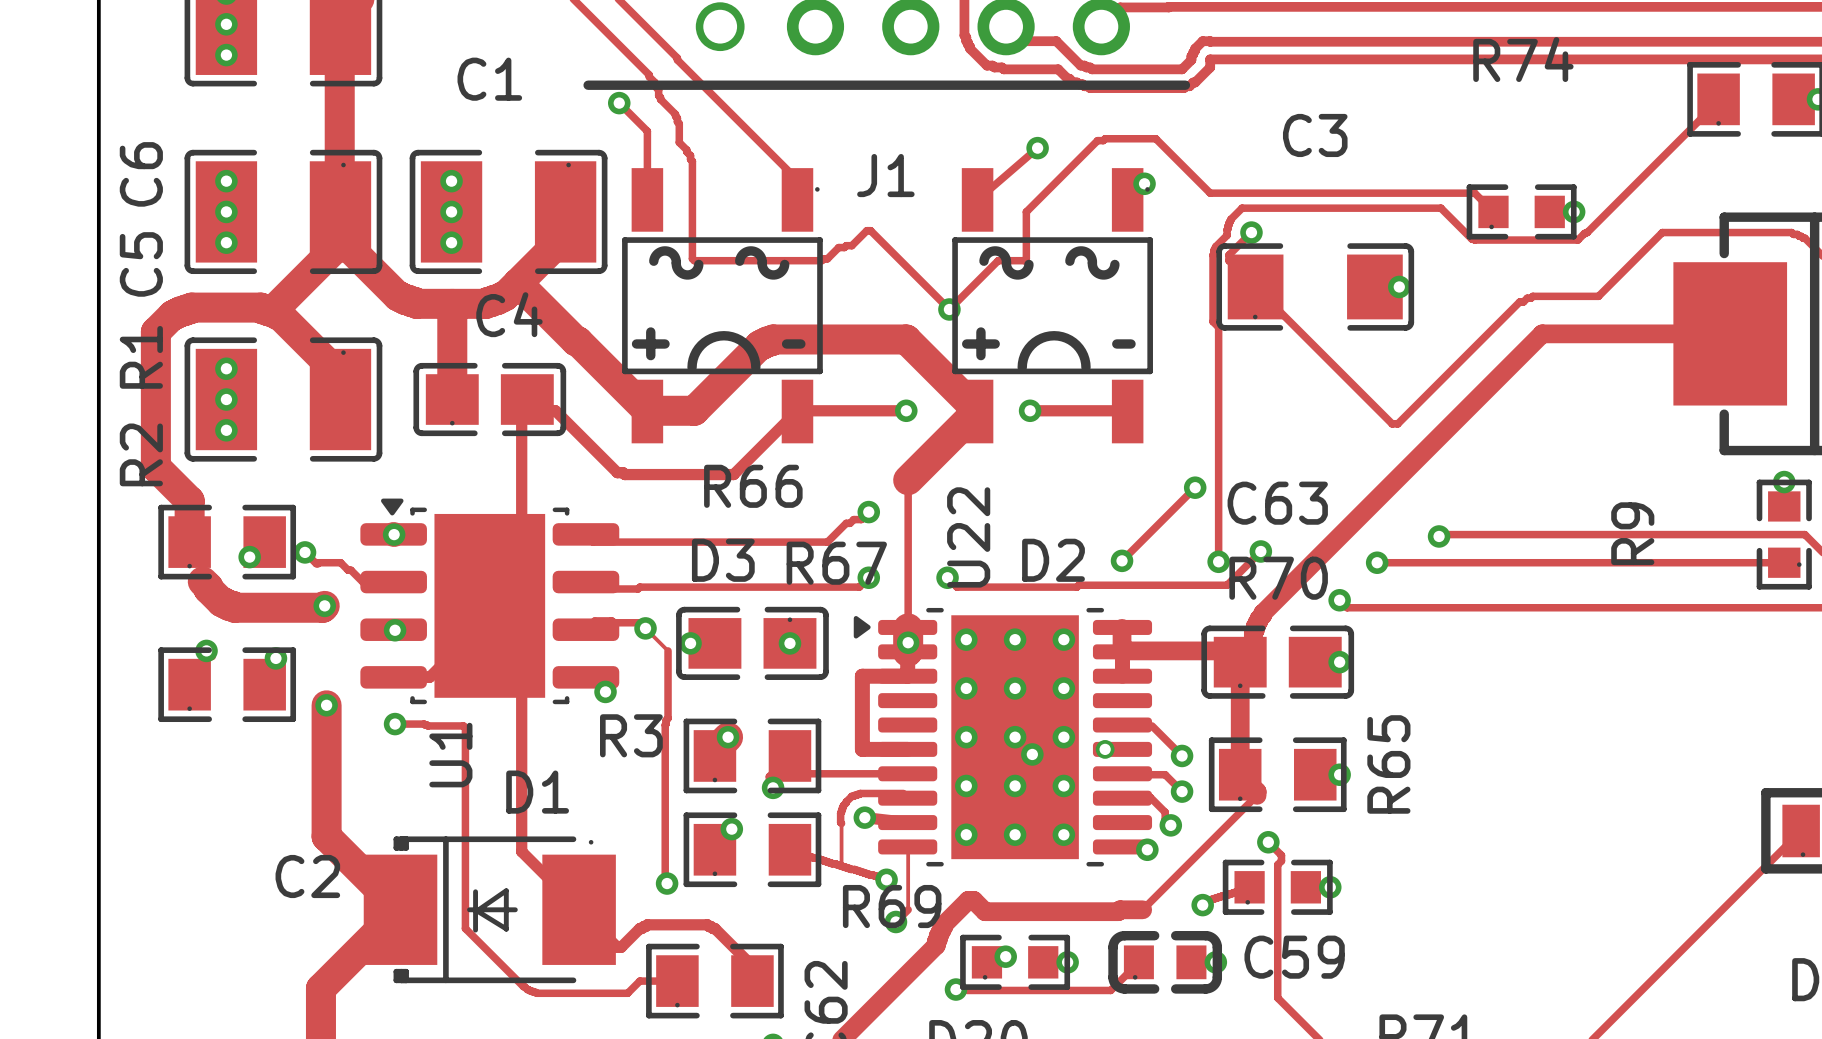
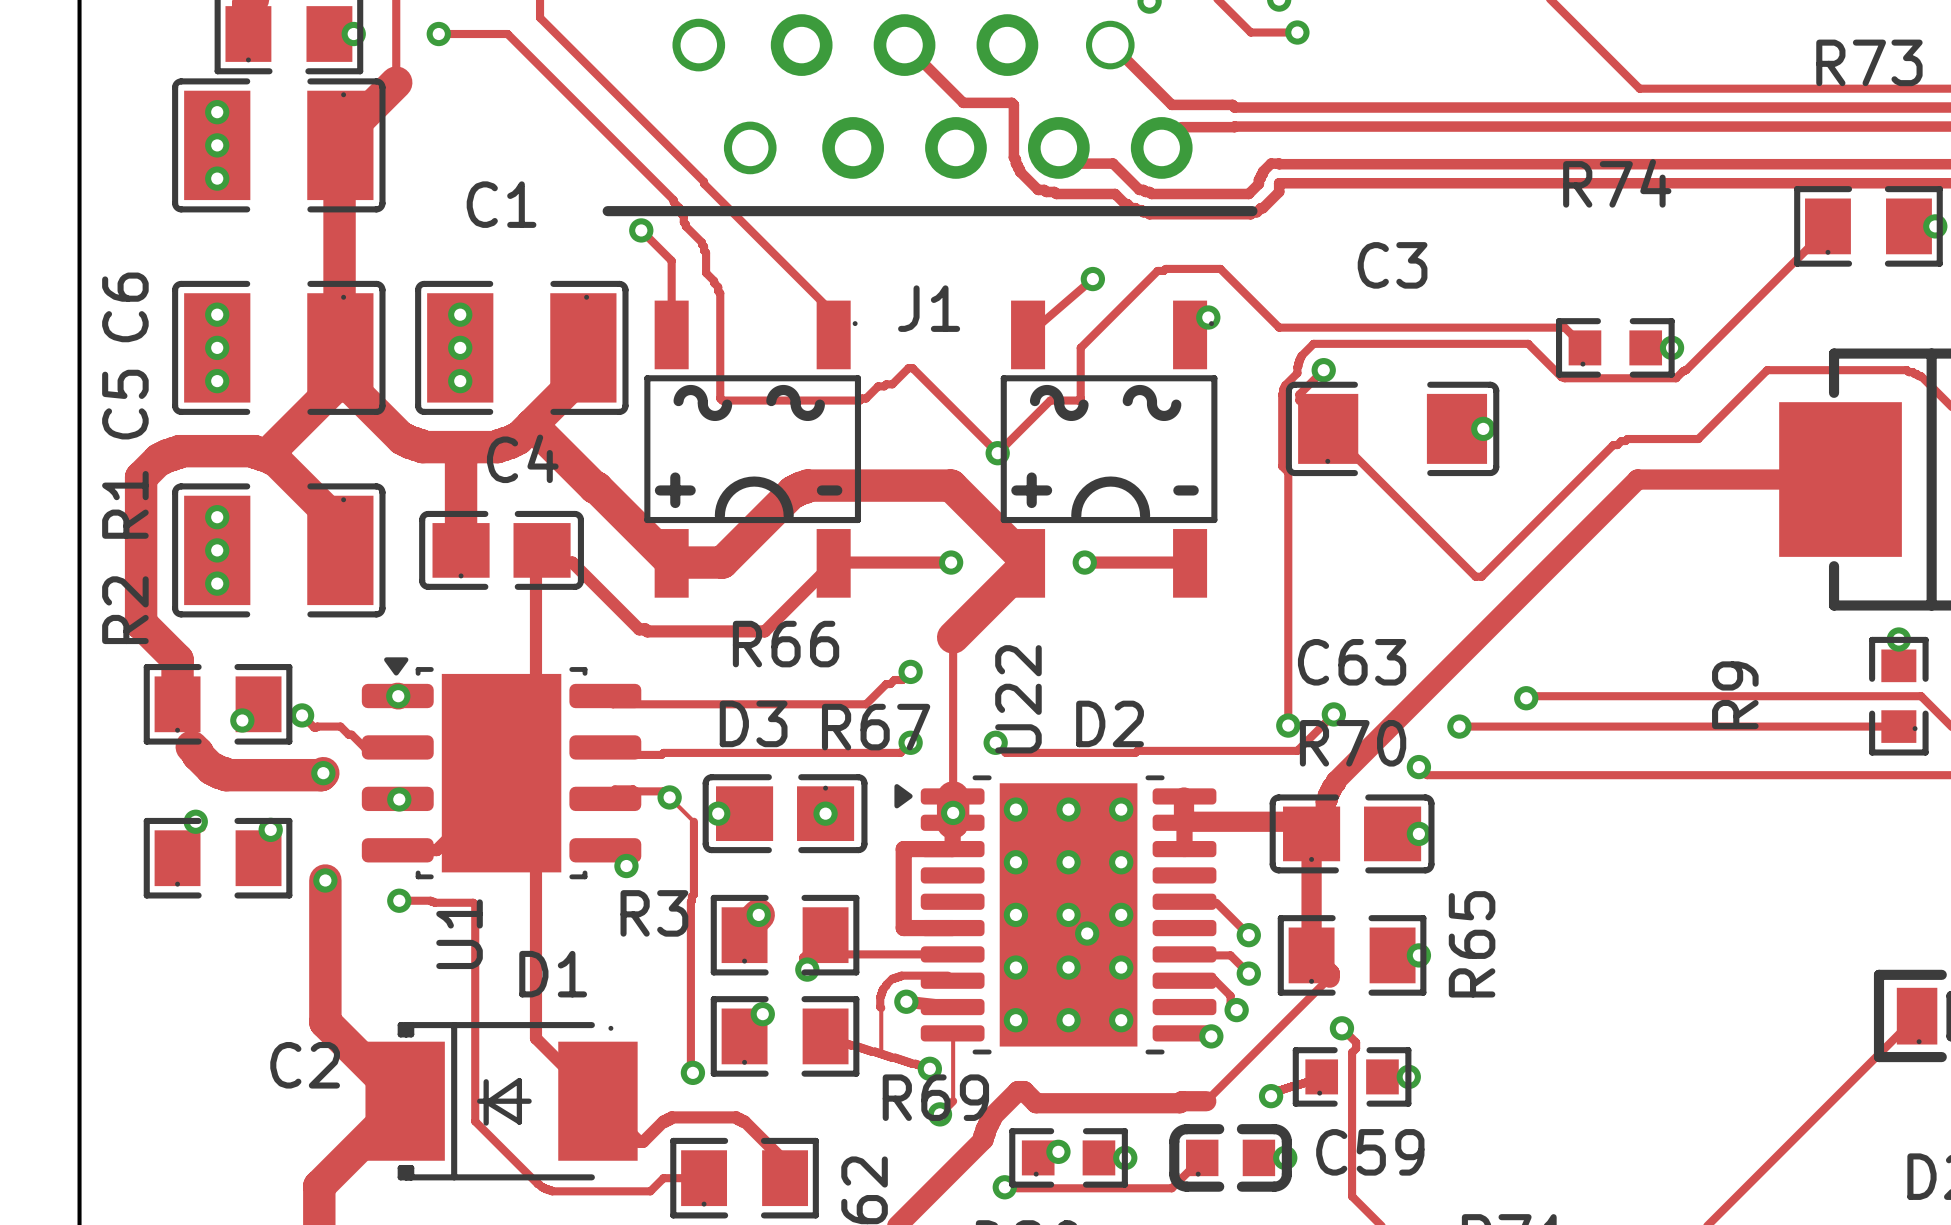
track: (1195, 487) (1122, 560) -> none
via: (1195, 487) -> none
via: (1122, 560) -> none
via: (1105, 749) -> none

